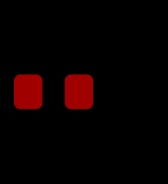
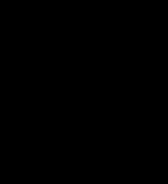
part: (53, 91) -> none

